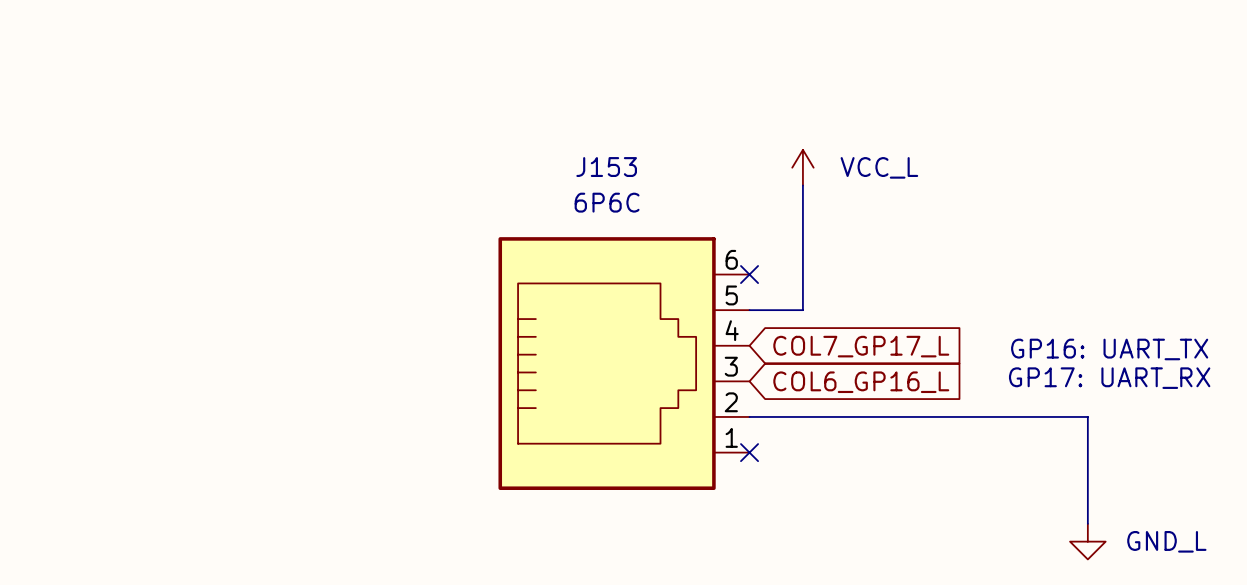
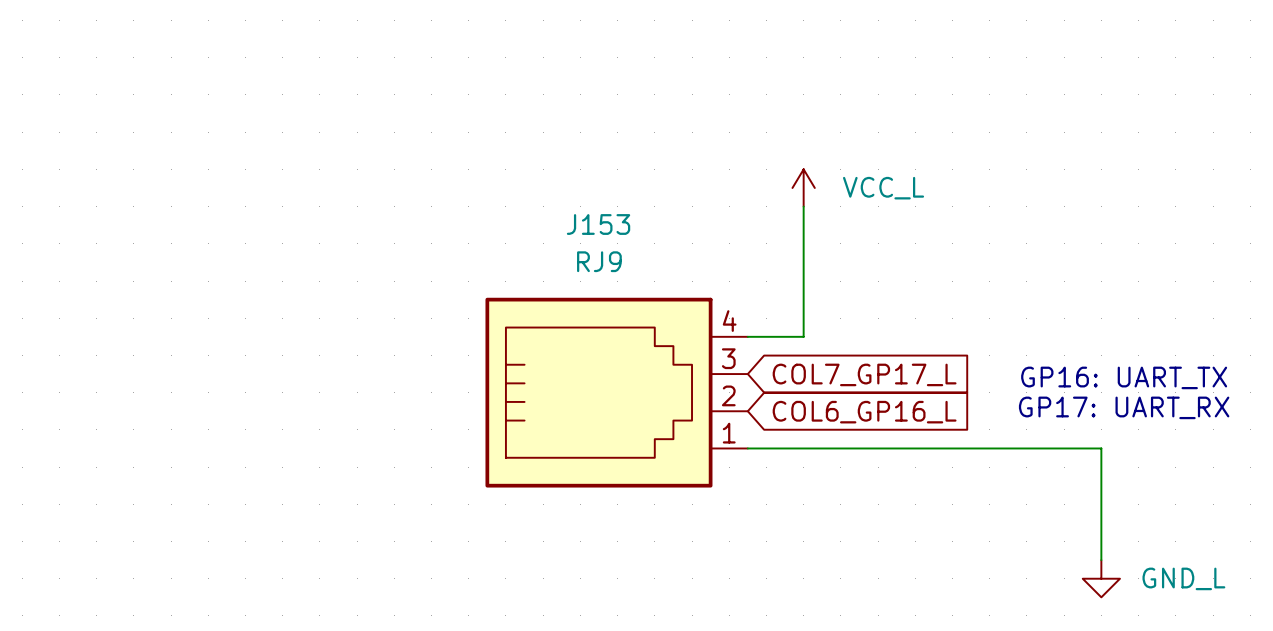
J153 name position: J153 (606, 167) -> J153 (598, 224)
J153 value: 6P6C (607, 202) -> RJ9 (599, 261)
J153 symbol: [498, 237, 750, 490] -> [485, 297, 748, 488]
no-connect mark: (749, 274) -> none
no-connect mark: (749, 452) -> none

